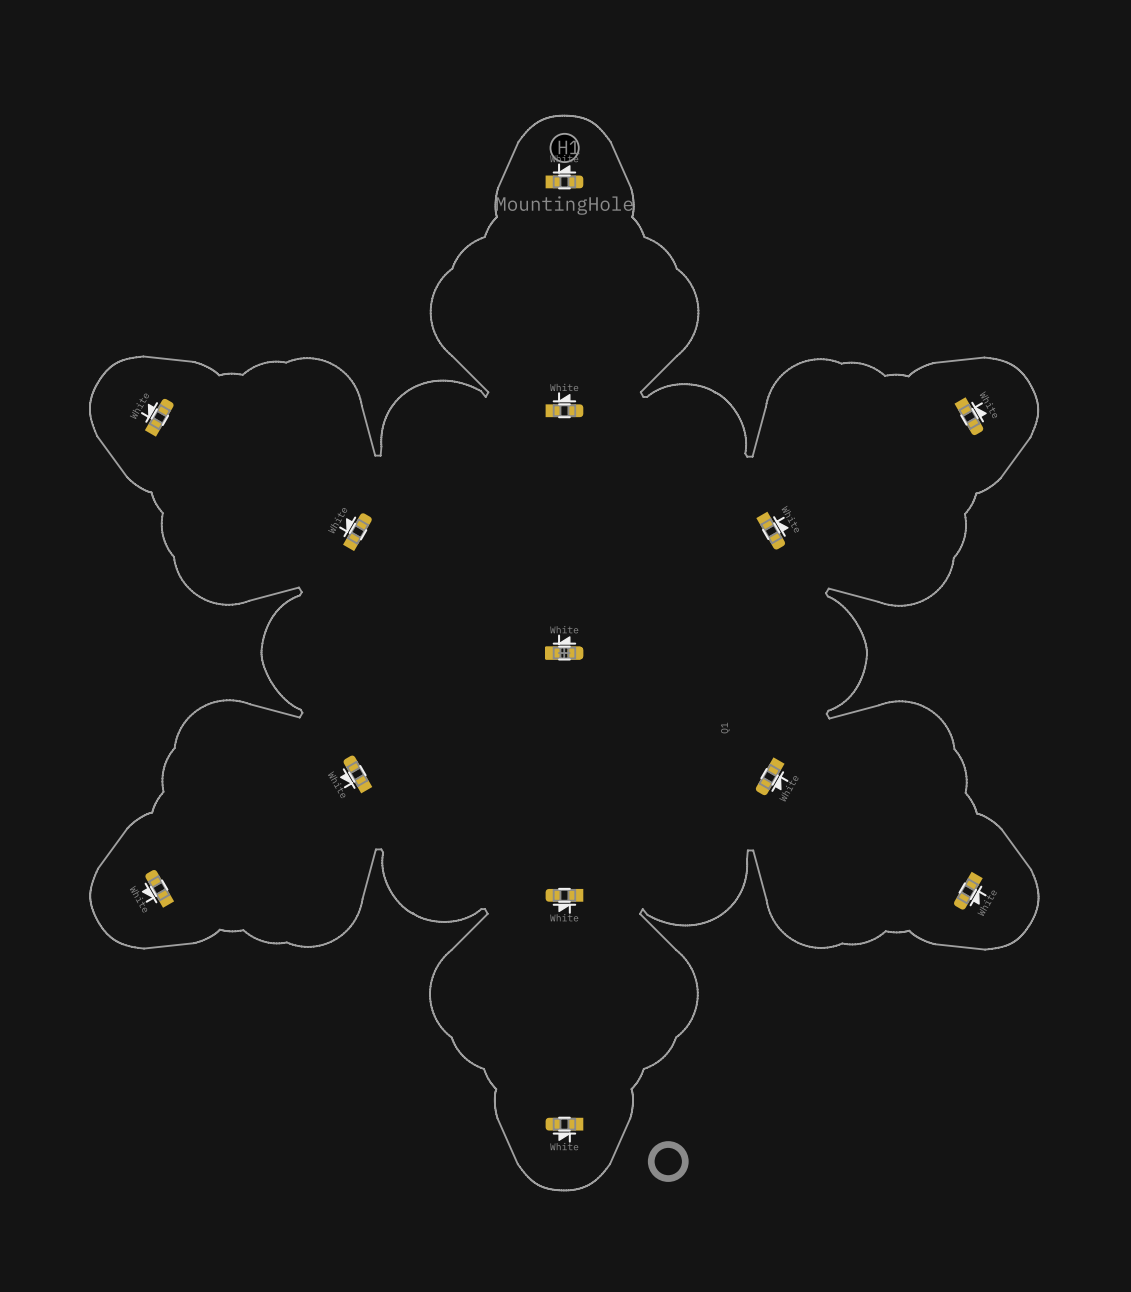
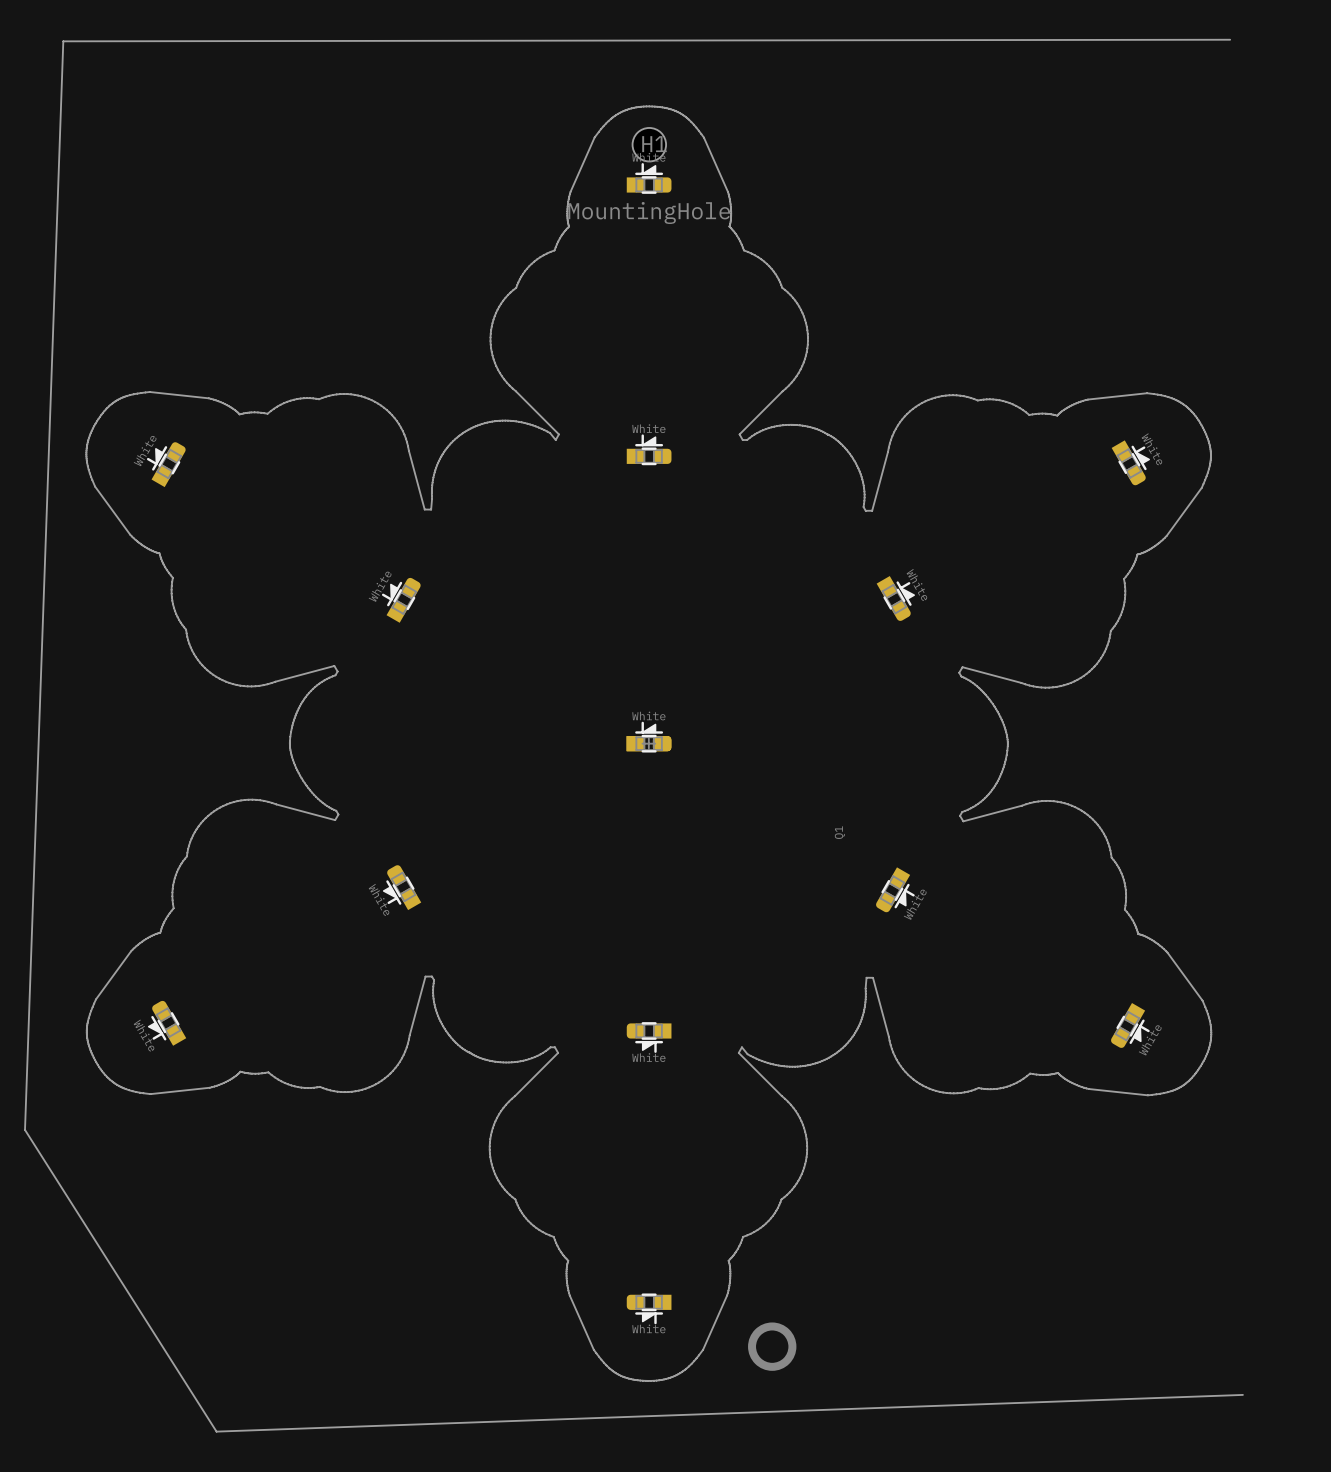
board edge: none -> (1230, 39) (63, 41) (25, 1129) (216, 1431) (1242, 1394)

